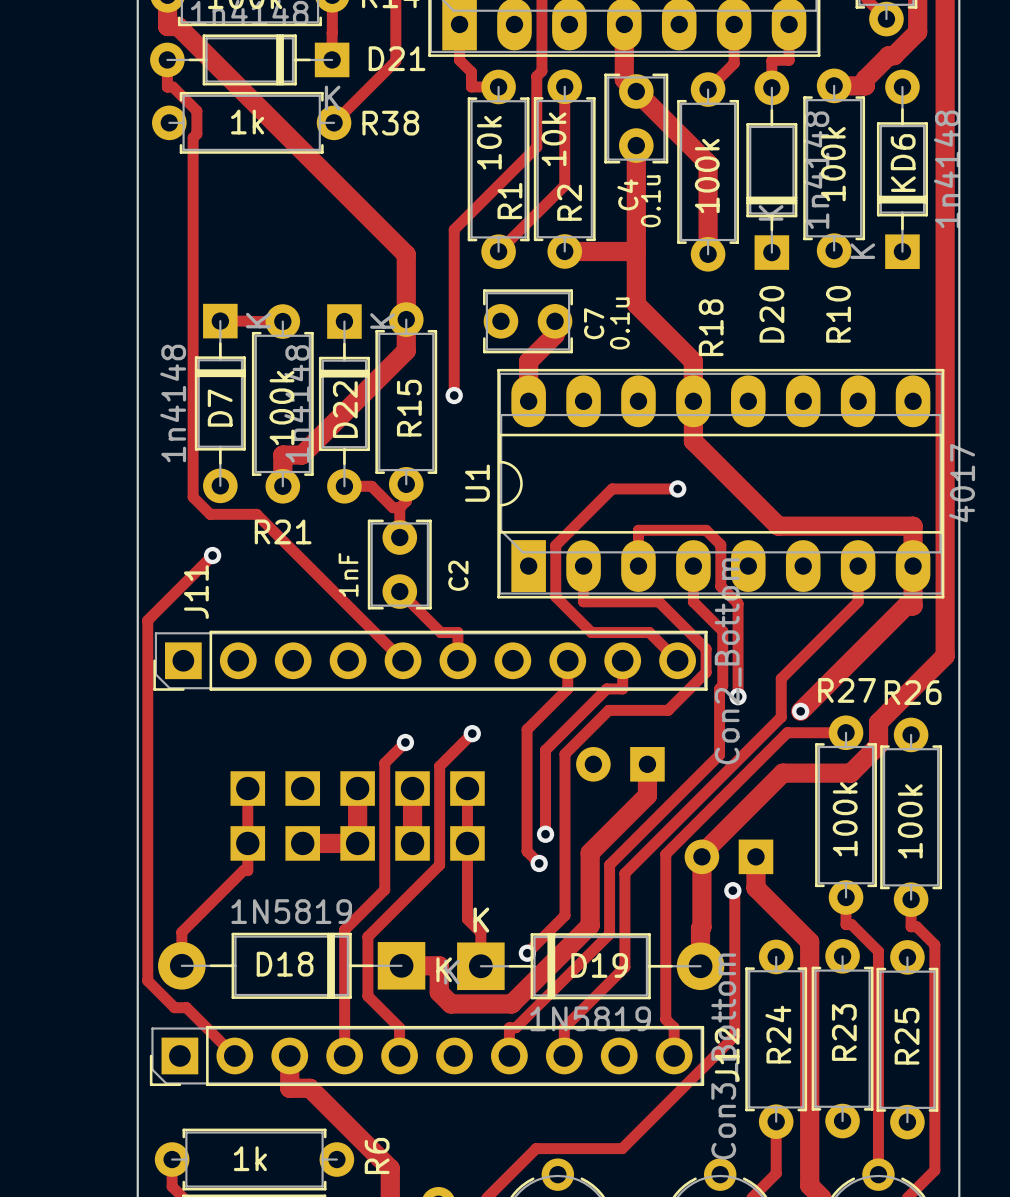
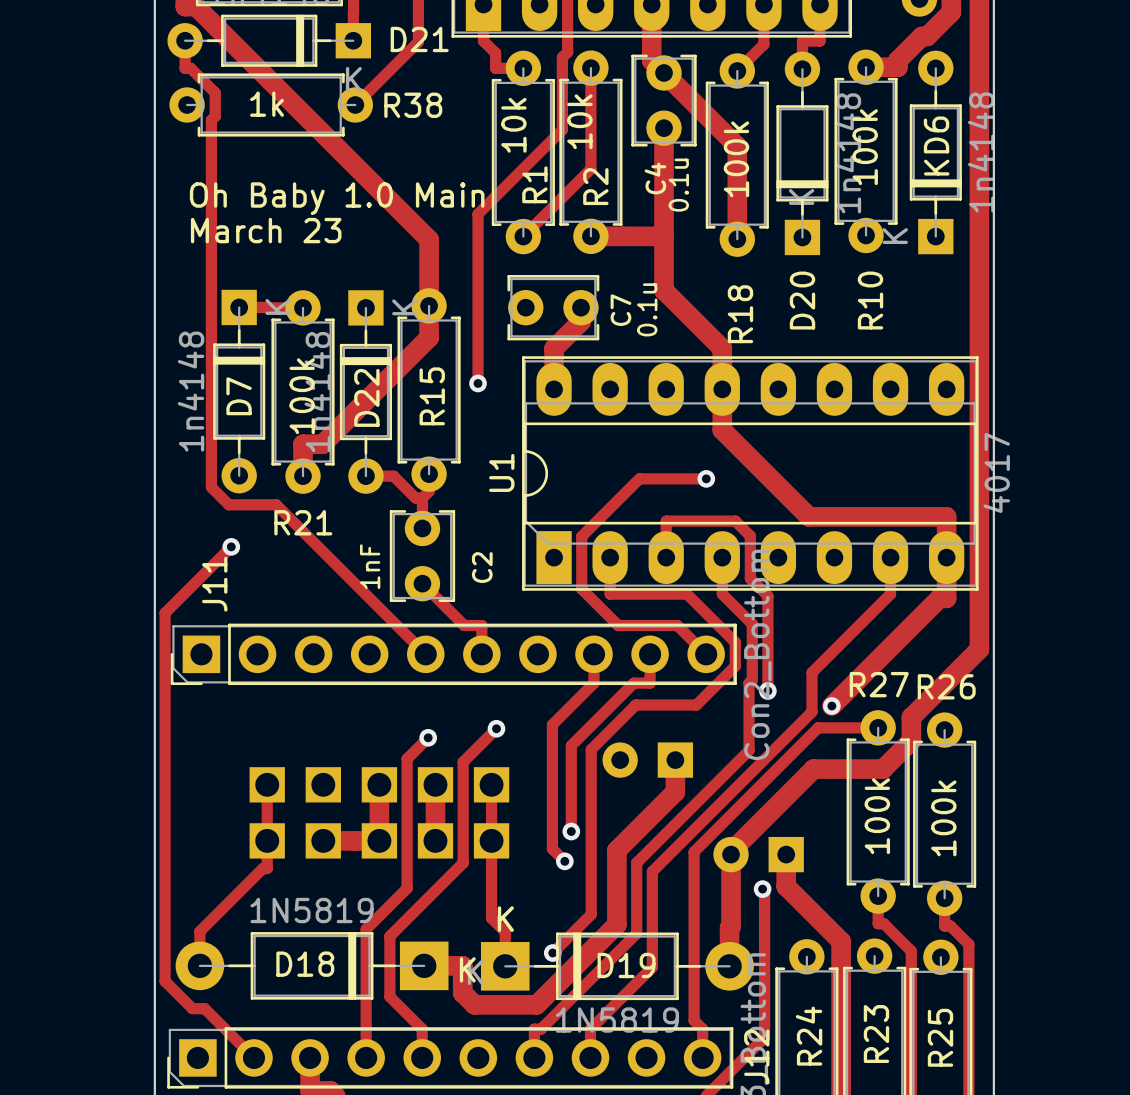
text: none -> Oh Baby 1.0 Main (337, 198)
text: none -> March 23 (266, 230)

